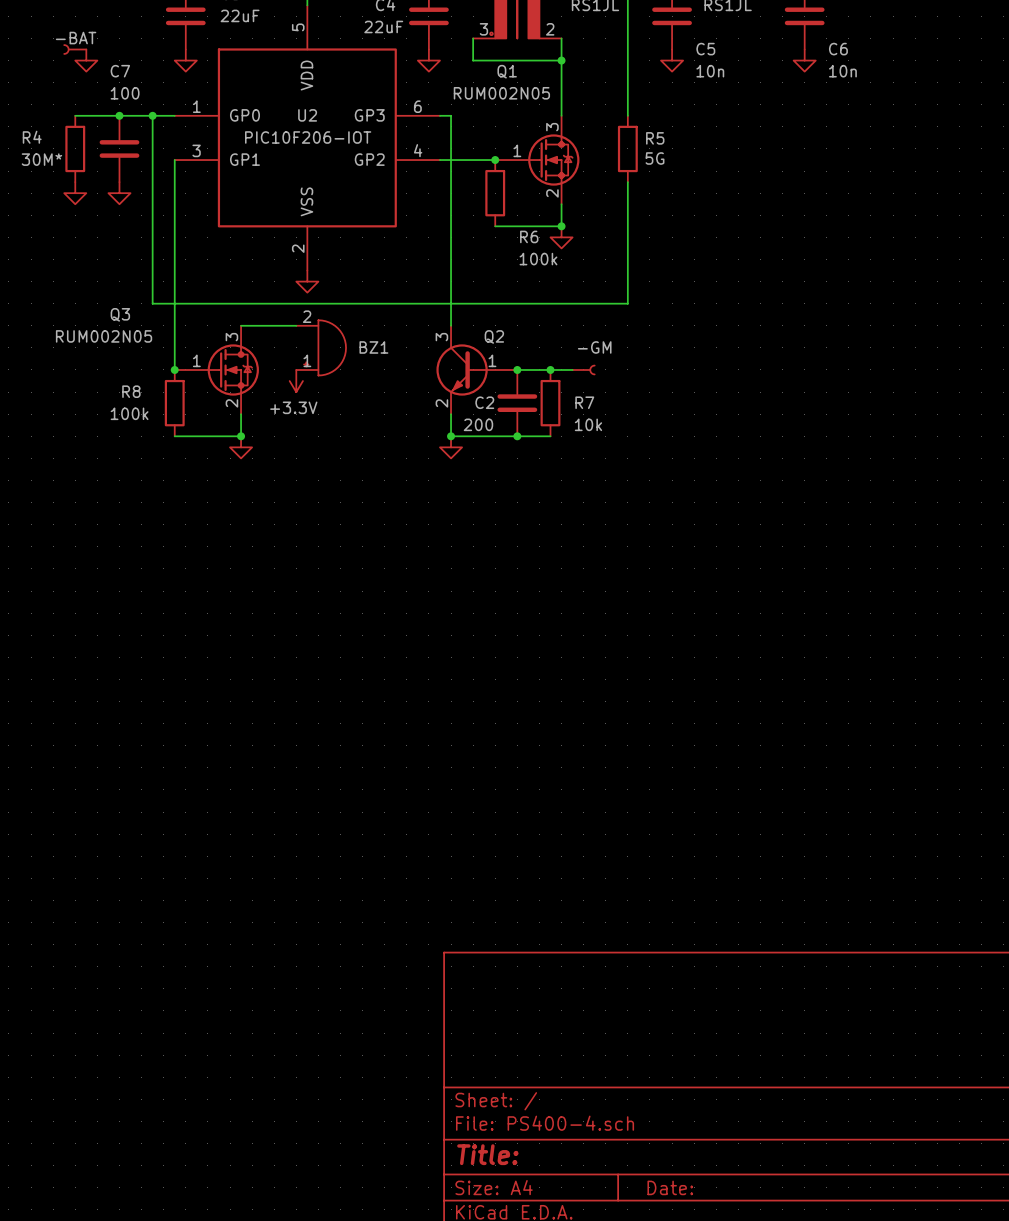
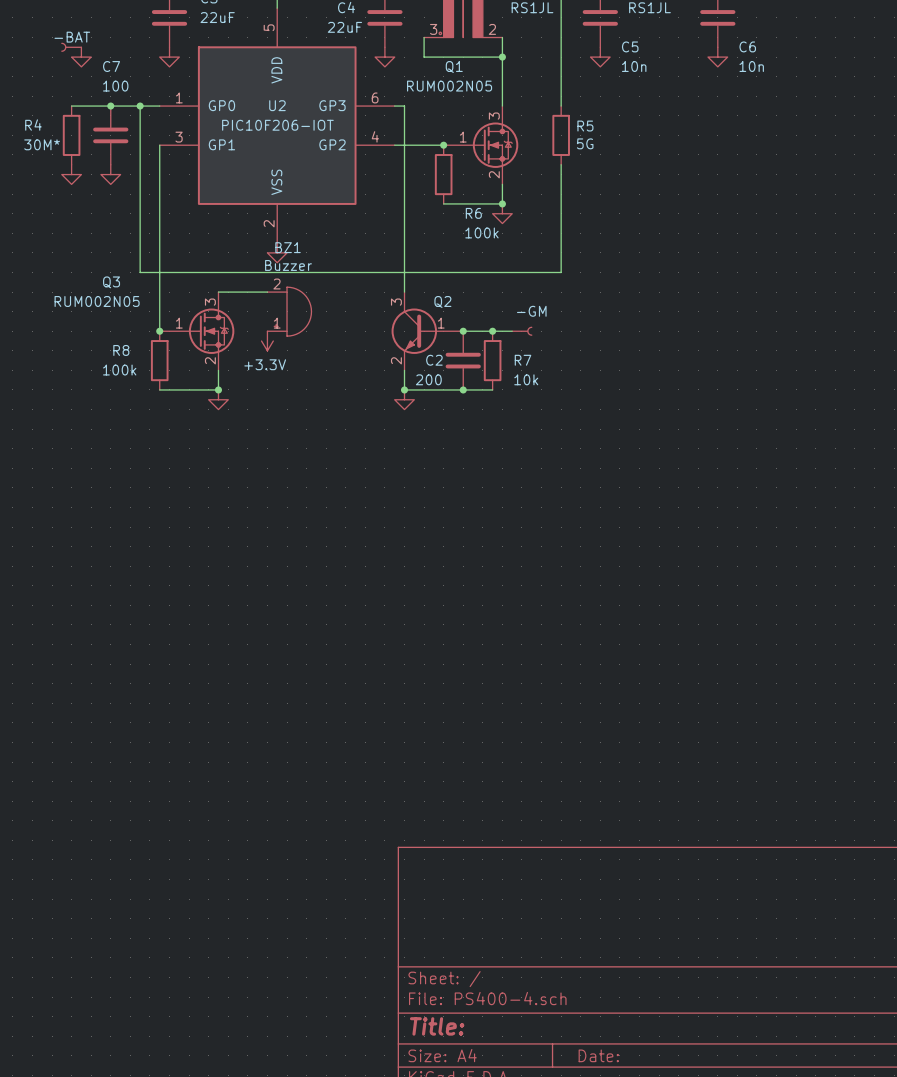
BZ1 value: none -> Buzzer (288, 265)
BZ1 name position: BZ1 (373, 347) -> BZ1 (288, 247)

